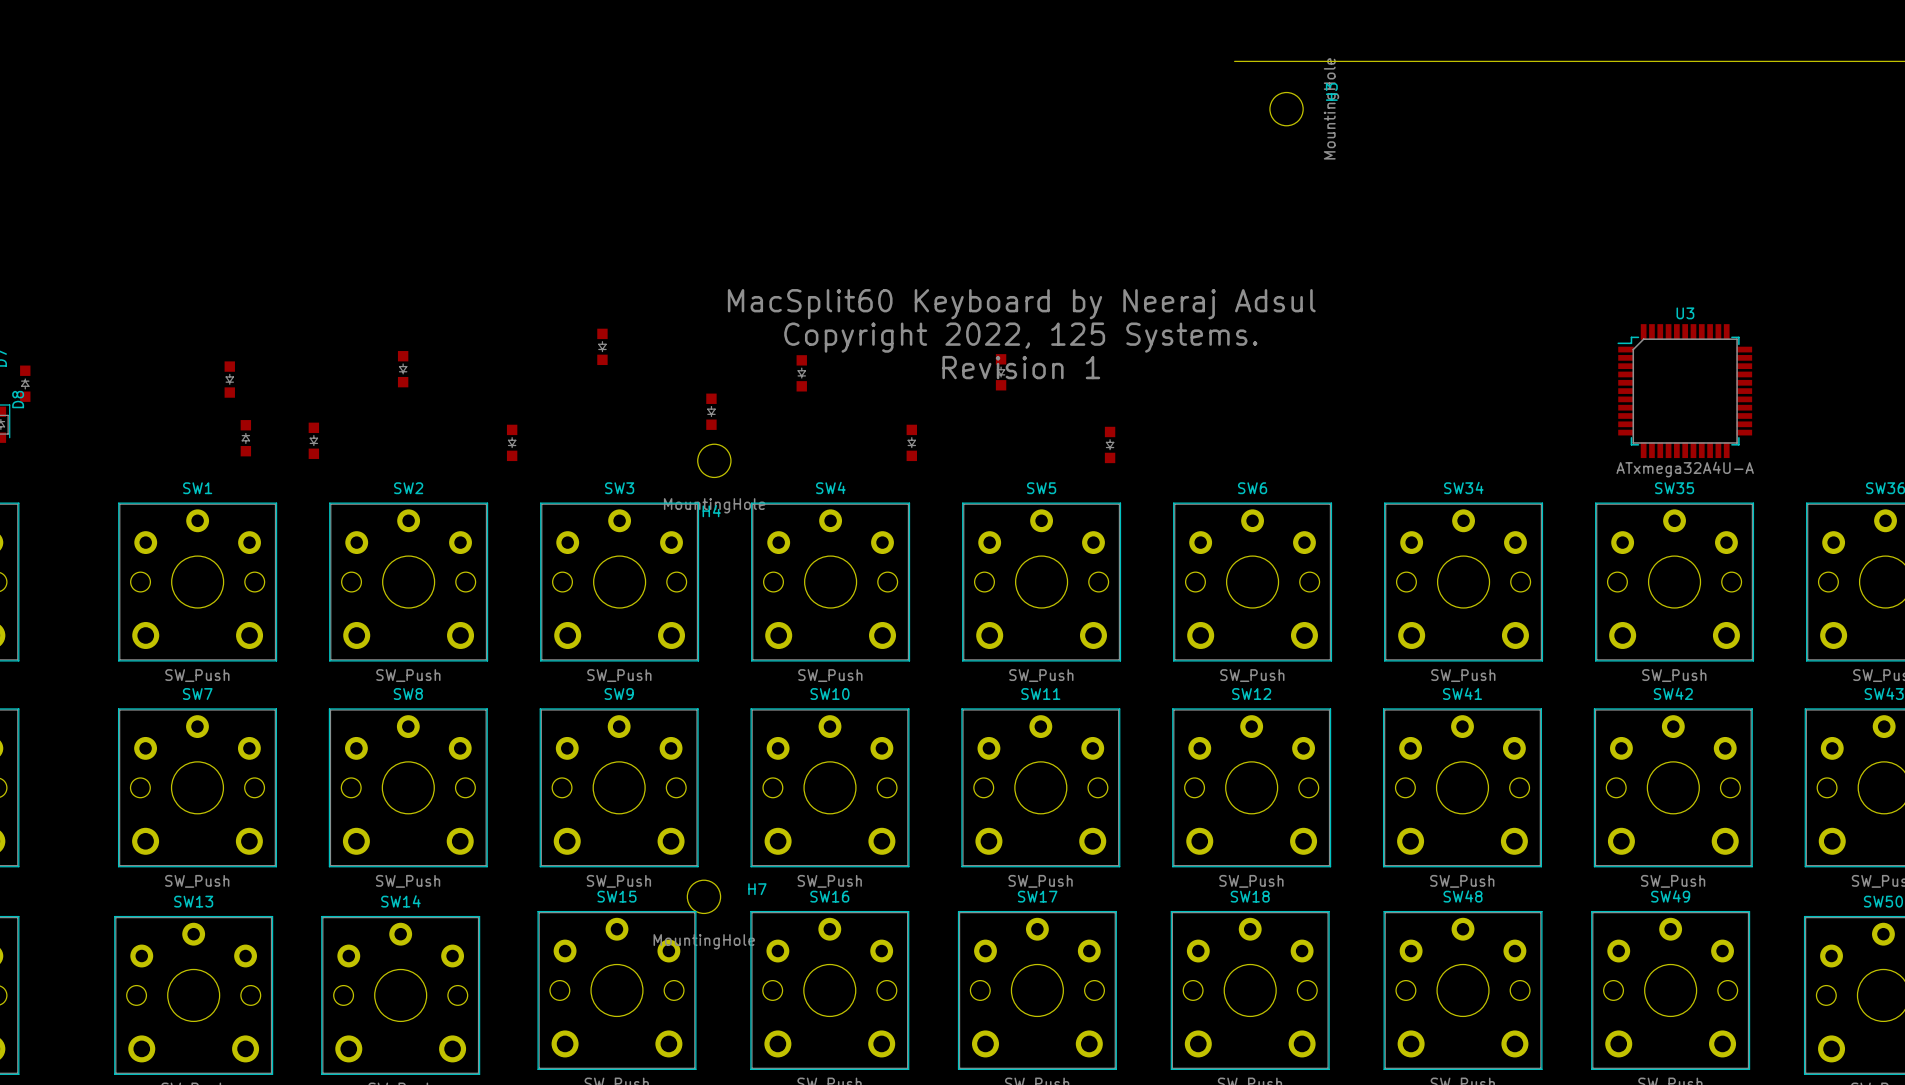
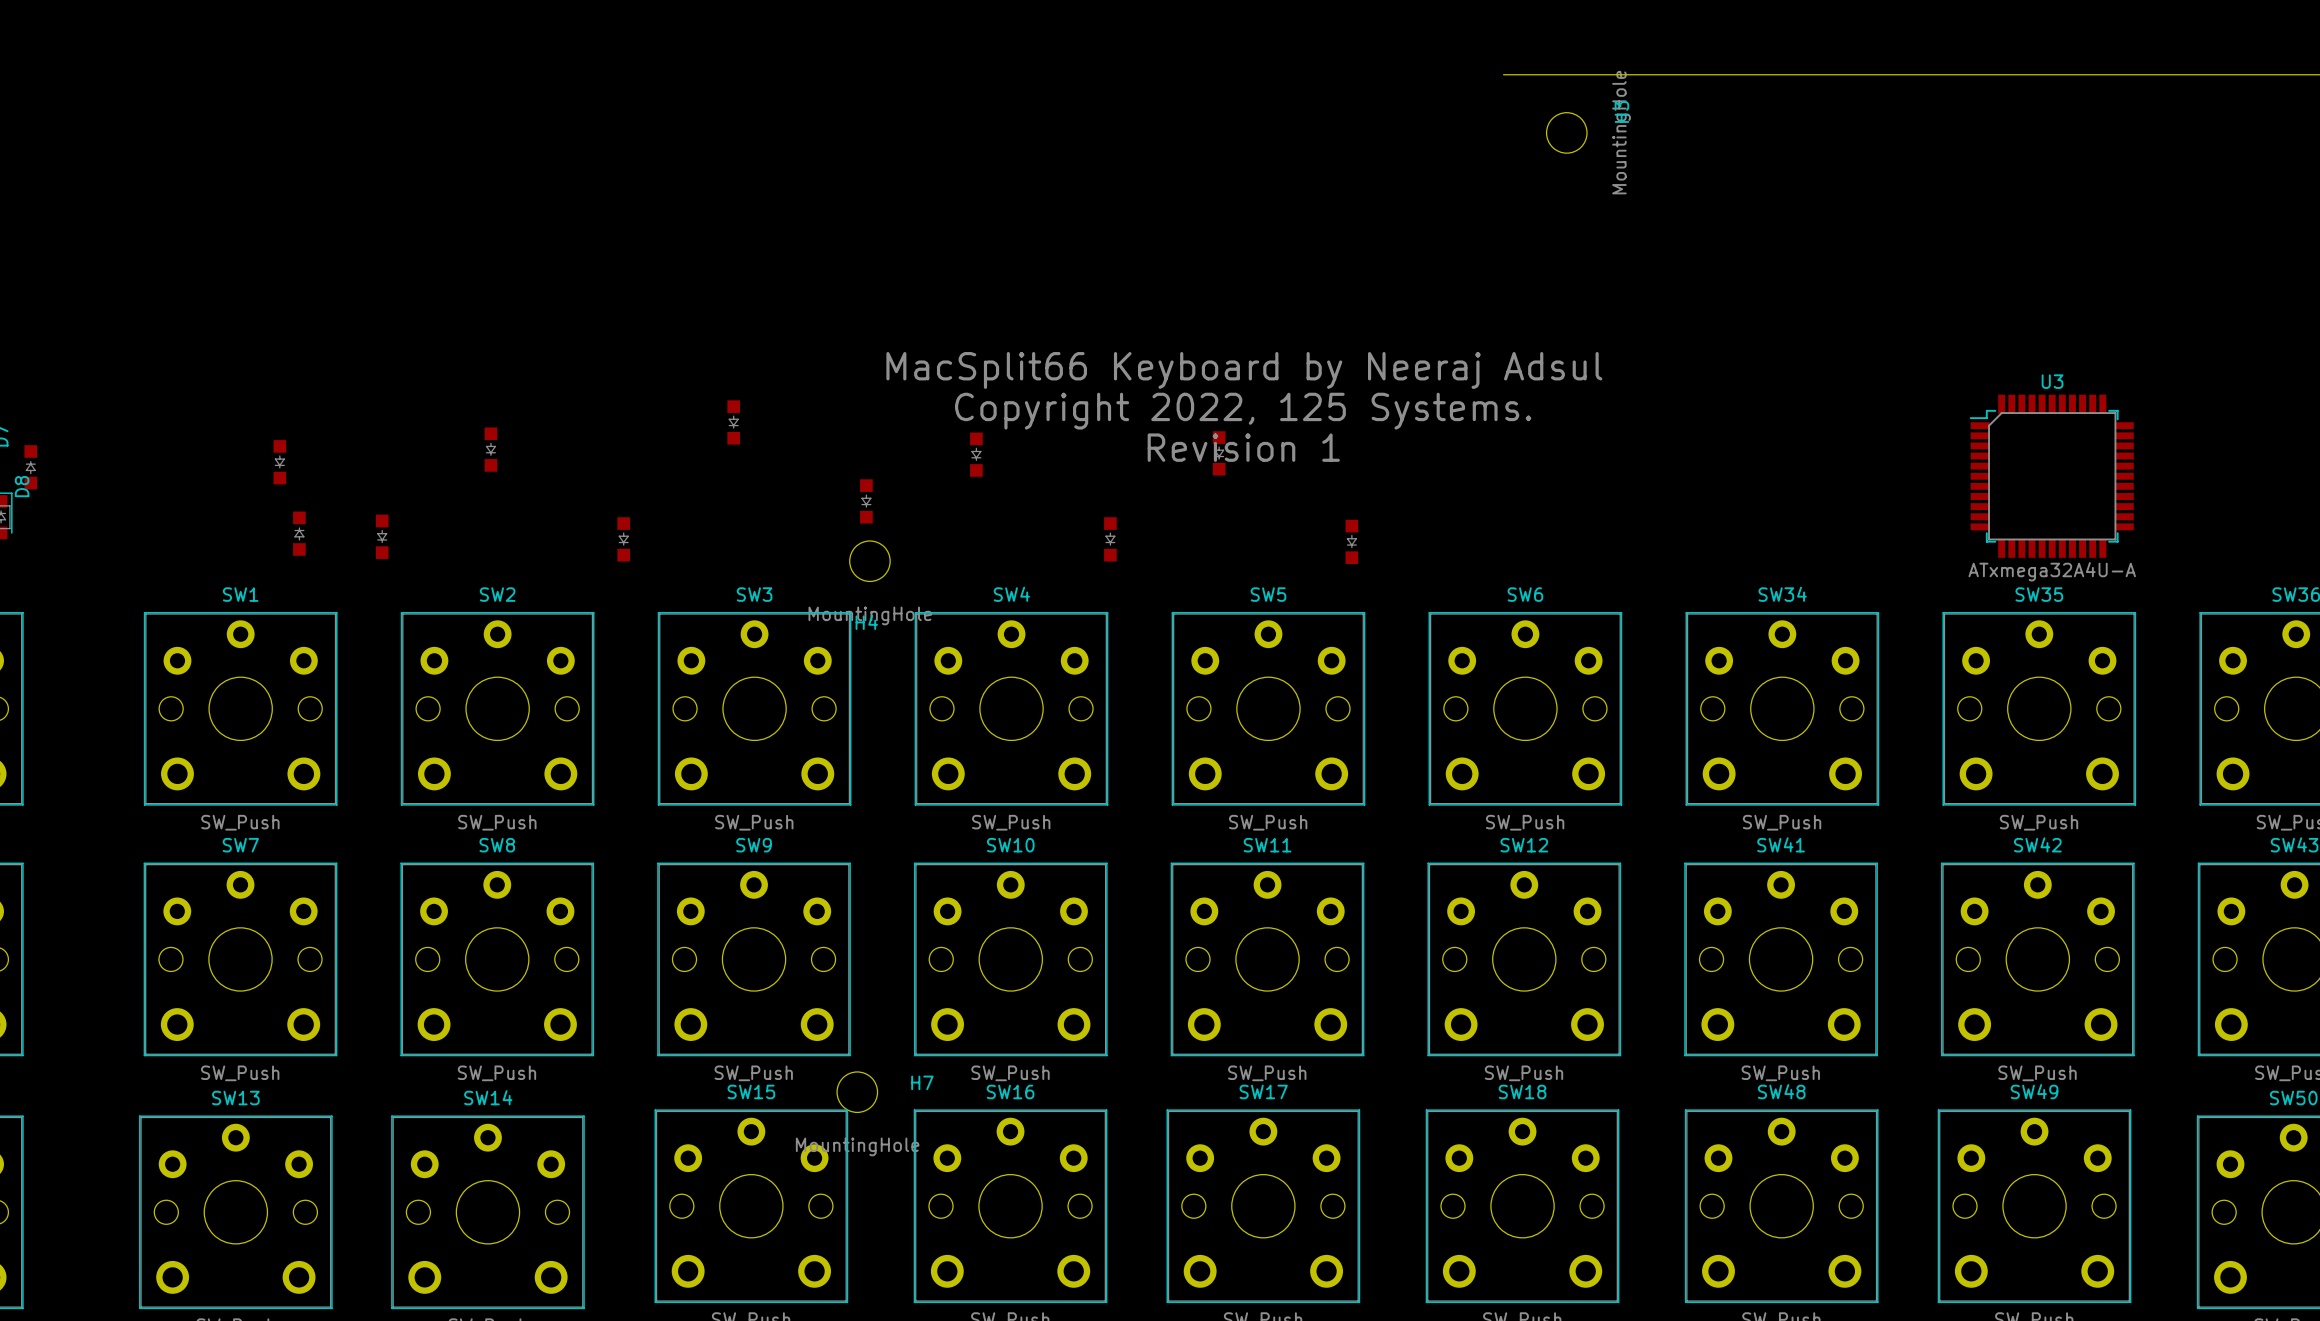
text: MacSplit60 Keyboard by Neeraj Adsul (1021, 304) -> MacSplit66 Keyboard by Neeraj Adsul (1244, 370)

